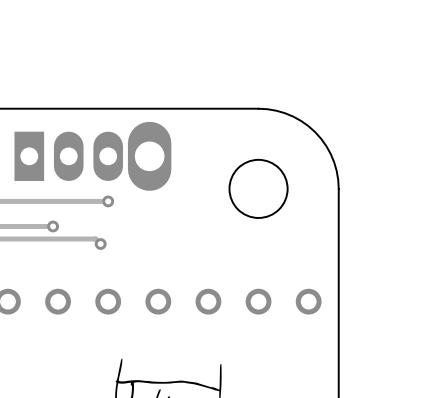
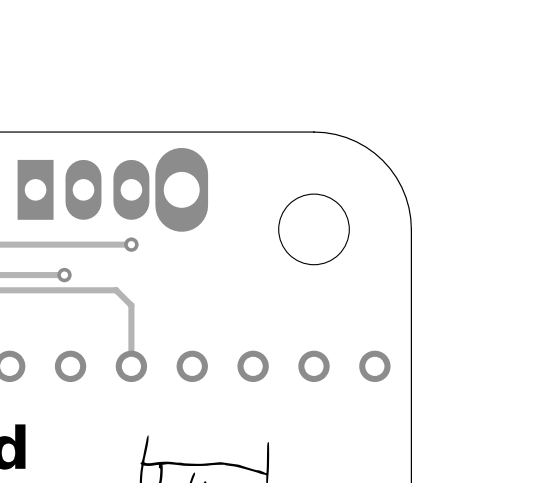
track: none -> (122, 296) (131, 305) (131, 366)
via: (100, 244) -> none

